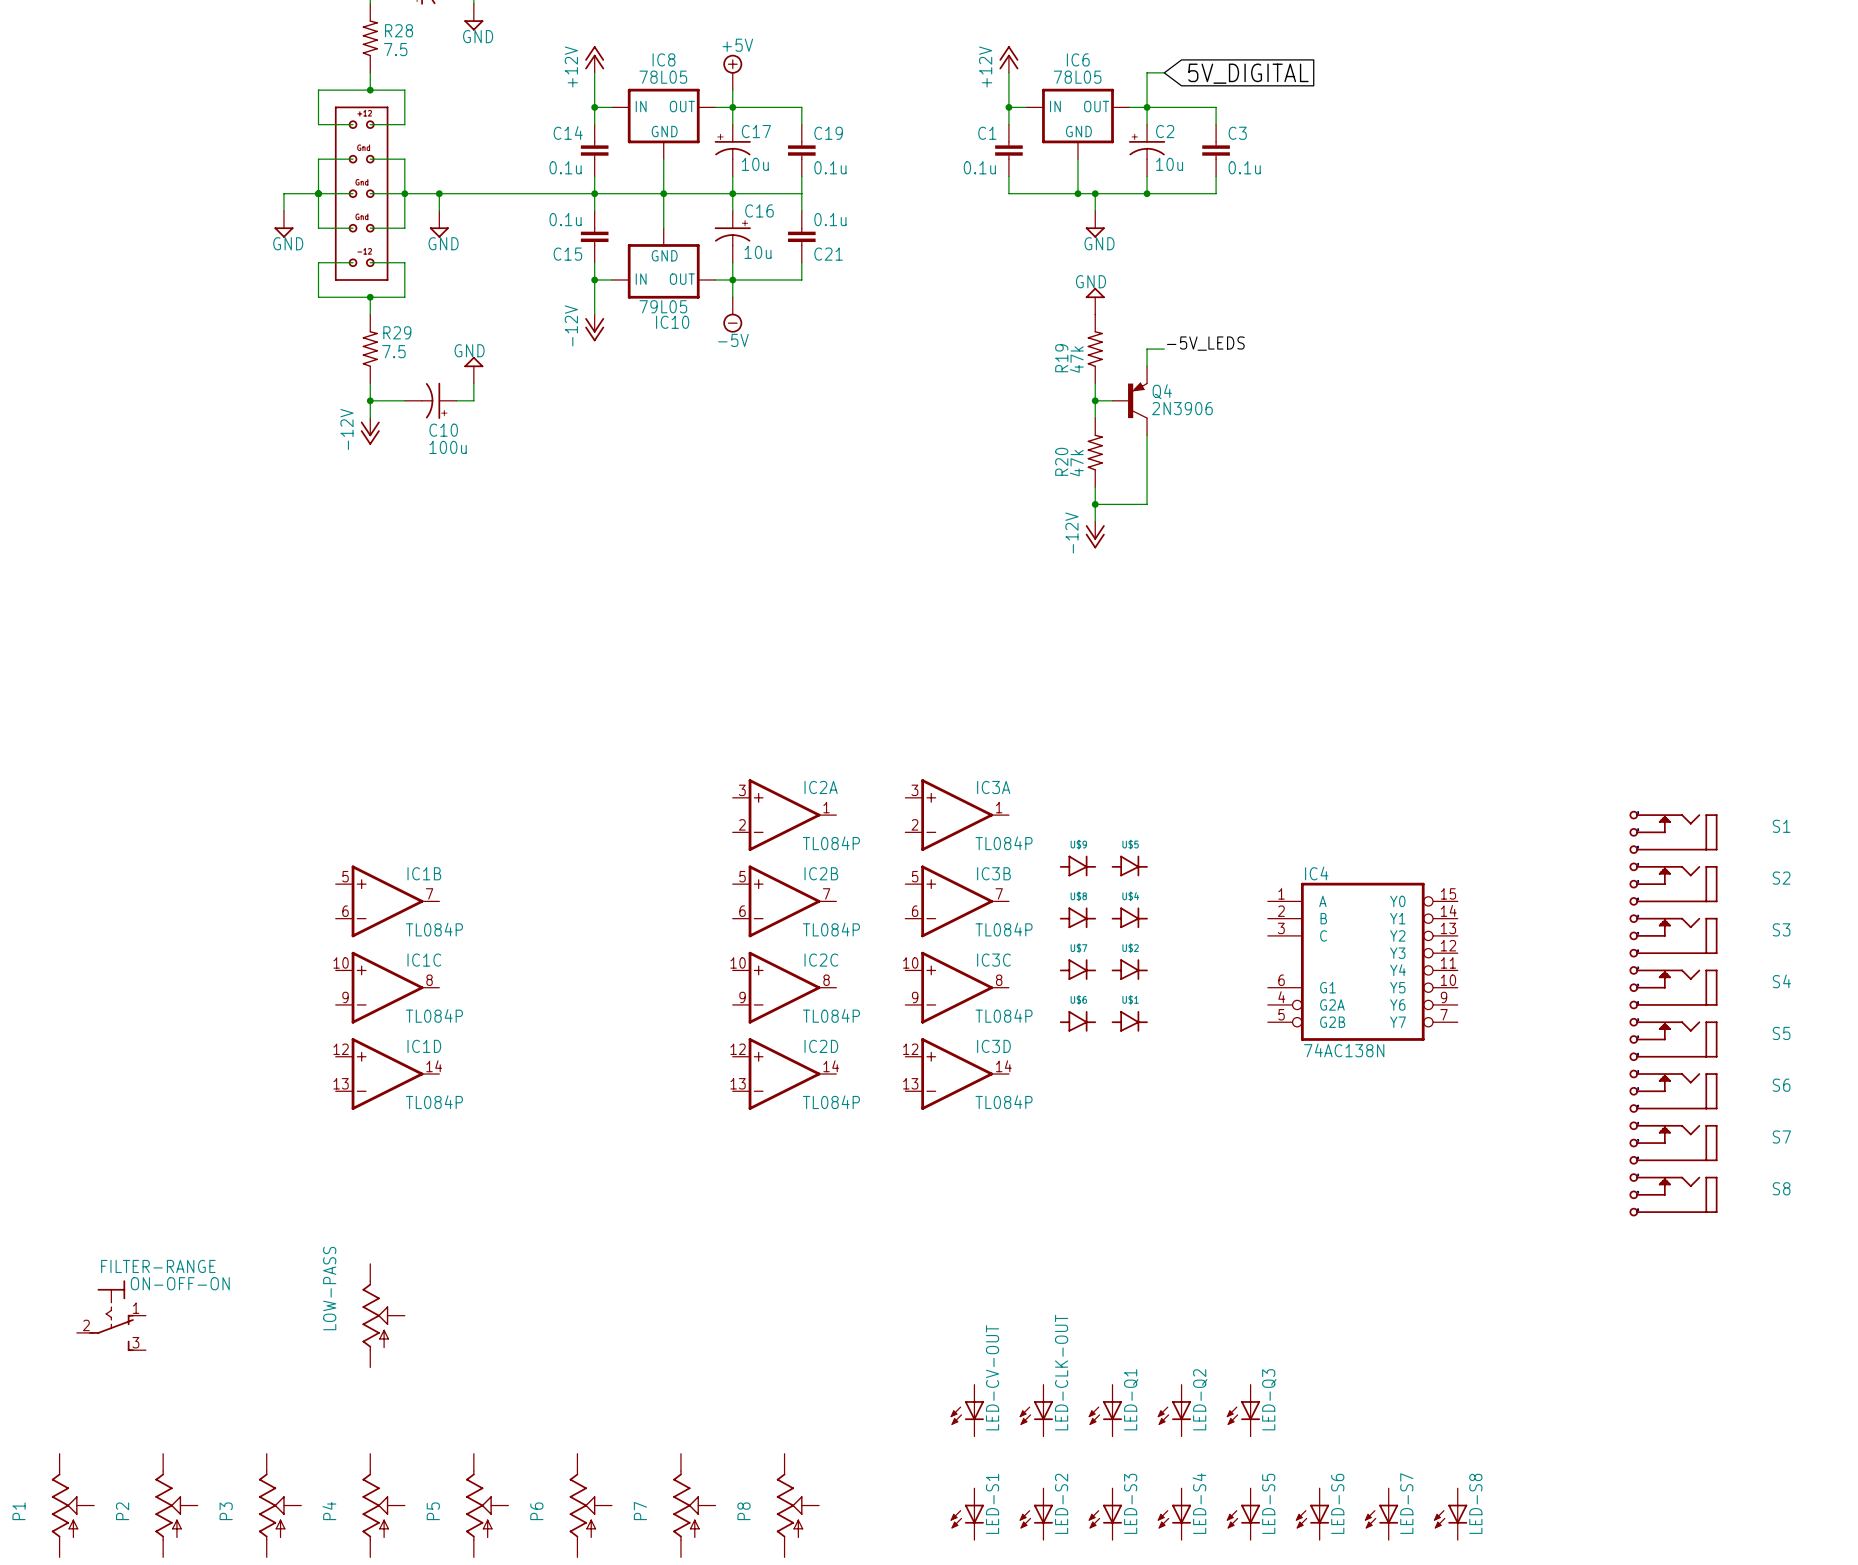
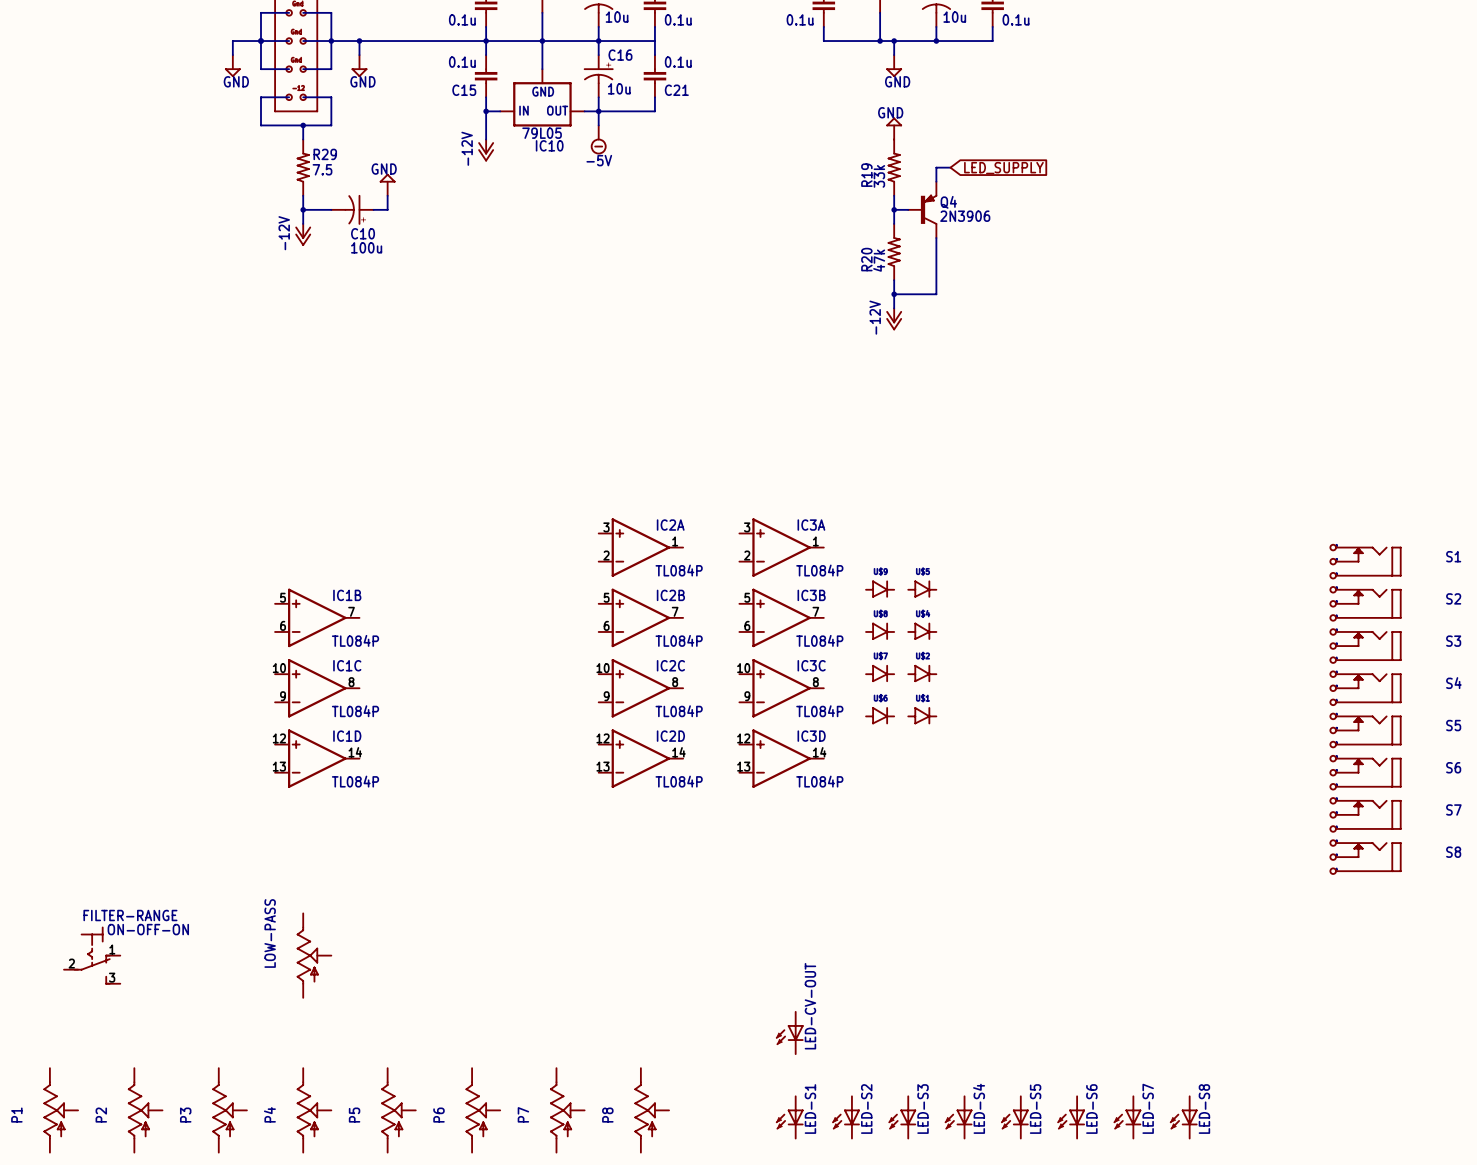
label: -5V_LEDS (1205, 343) -> none
global label: none -> LED_SUPPLY (1003, 168)
R19 value: 47k (1076, 359) -> 33k (879, 176)
IC4: 74AC138N (1362, 961) -> none
LED-CLK-OUT: (1036, 1410) -> none
LED-Q1: (1105, 1410) -> none
LED-Q2: (1174, 1410) -> none
LED-Q3: (1243, 1410) -> none

